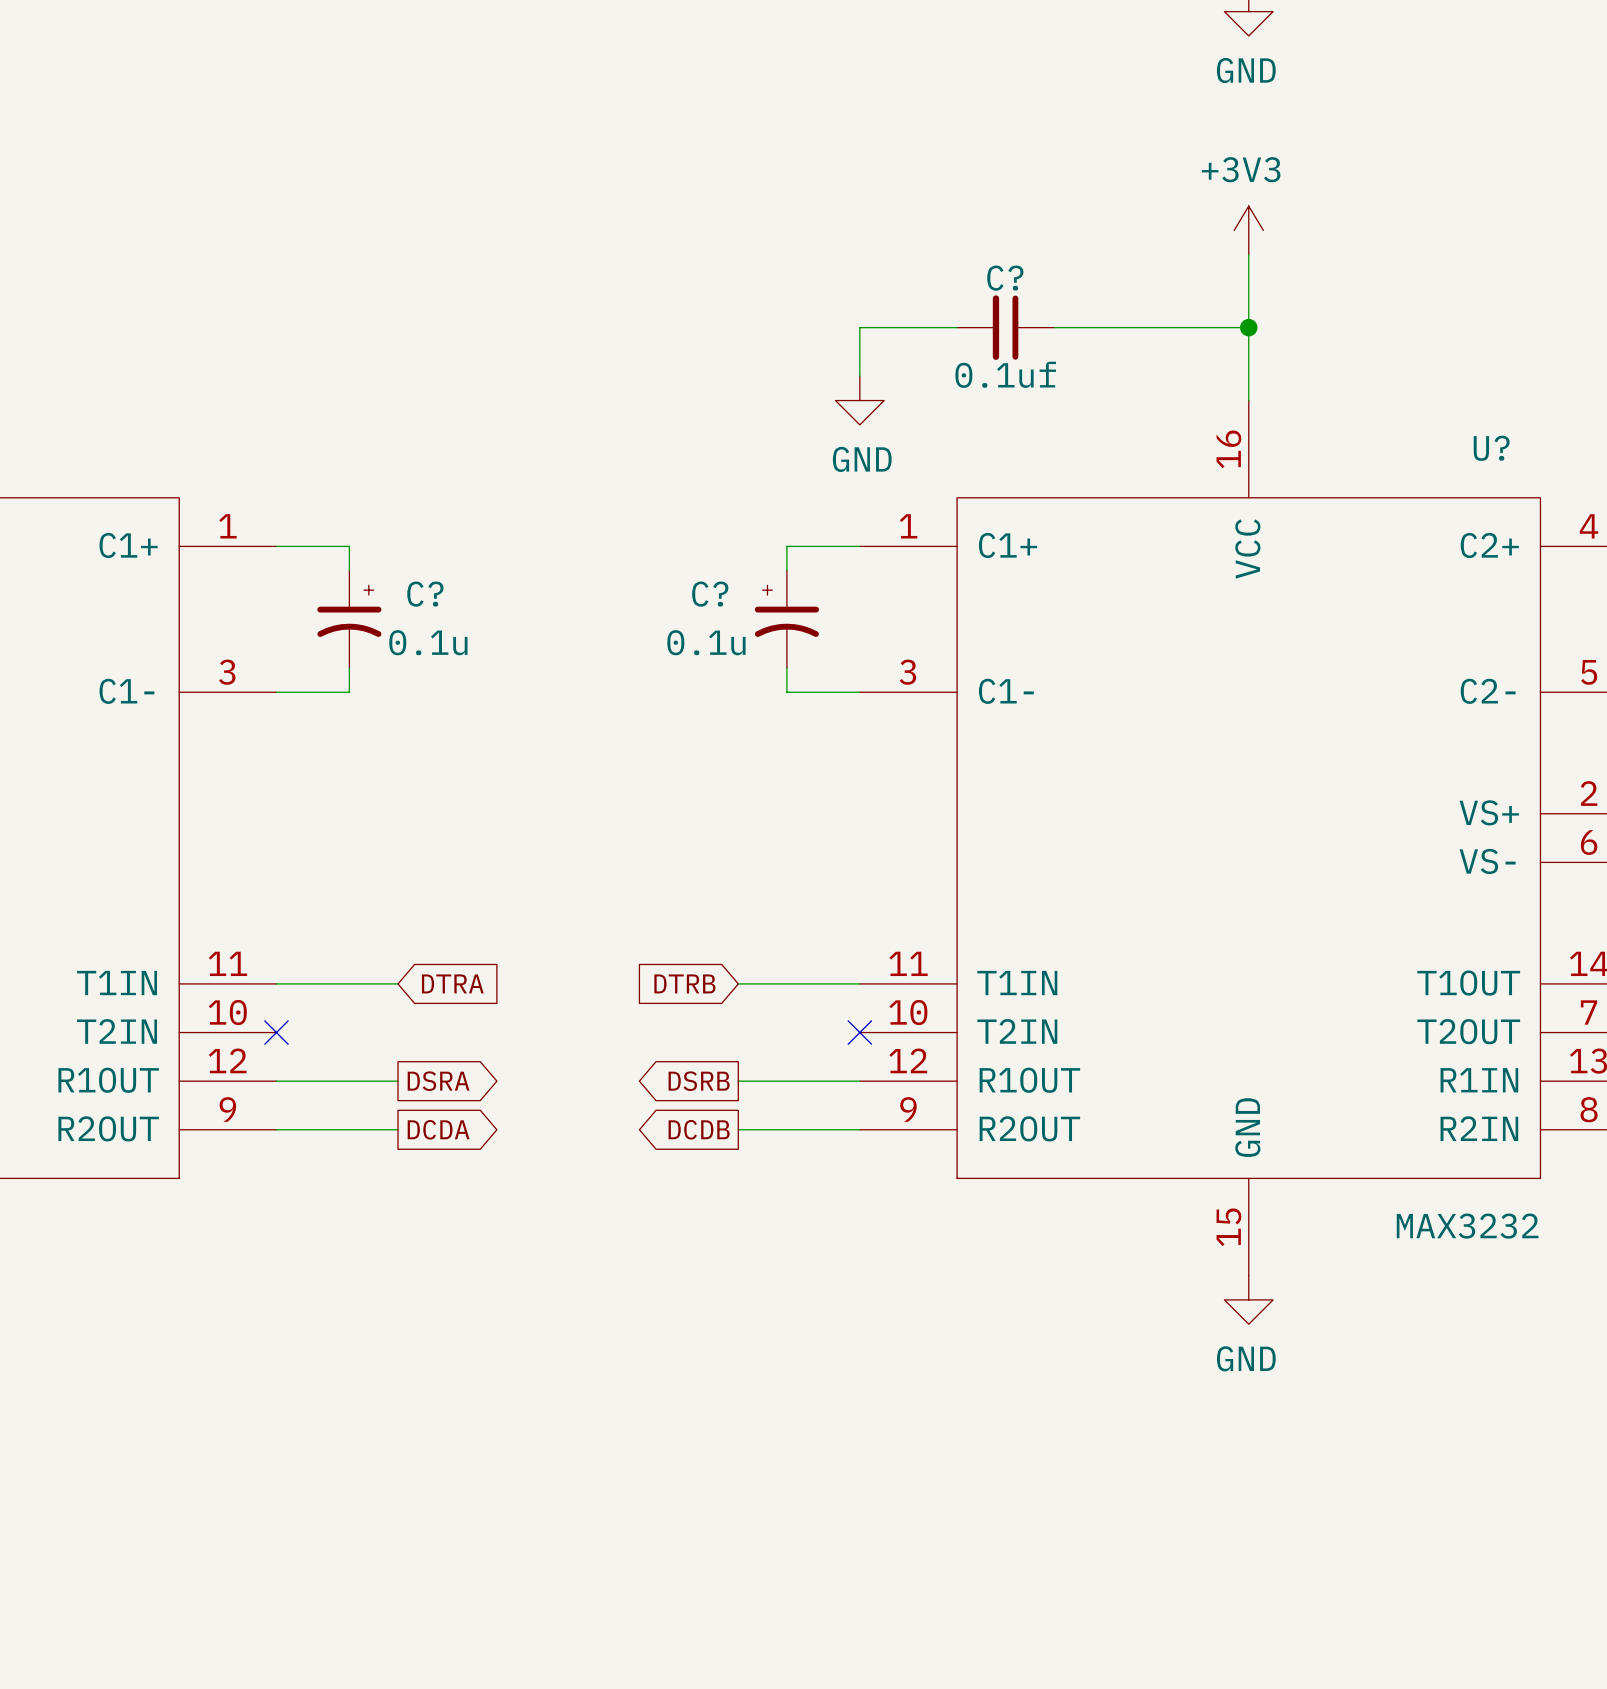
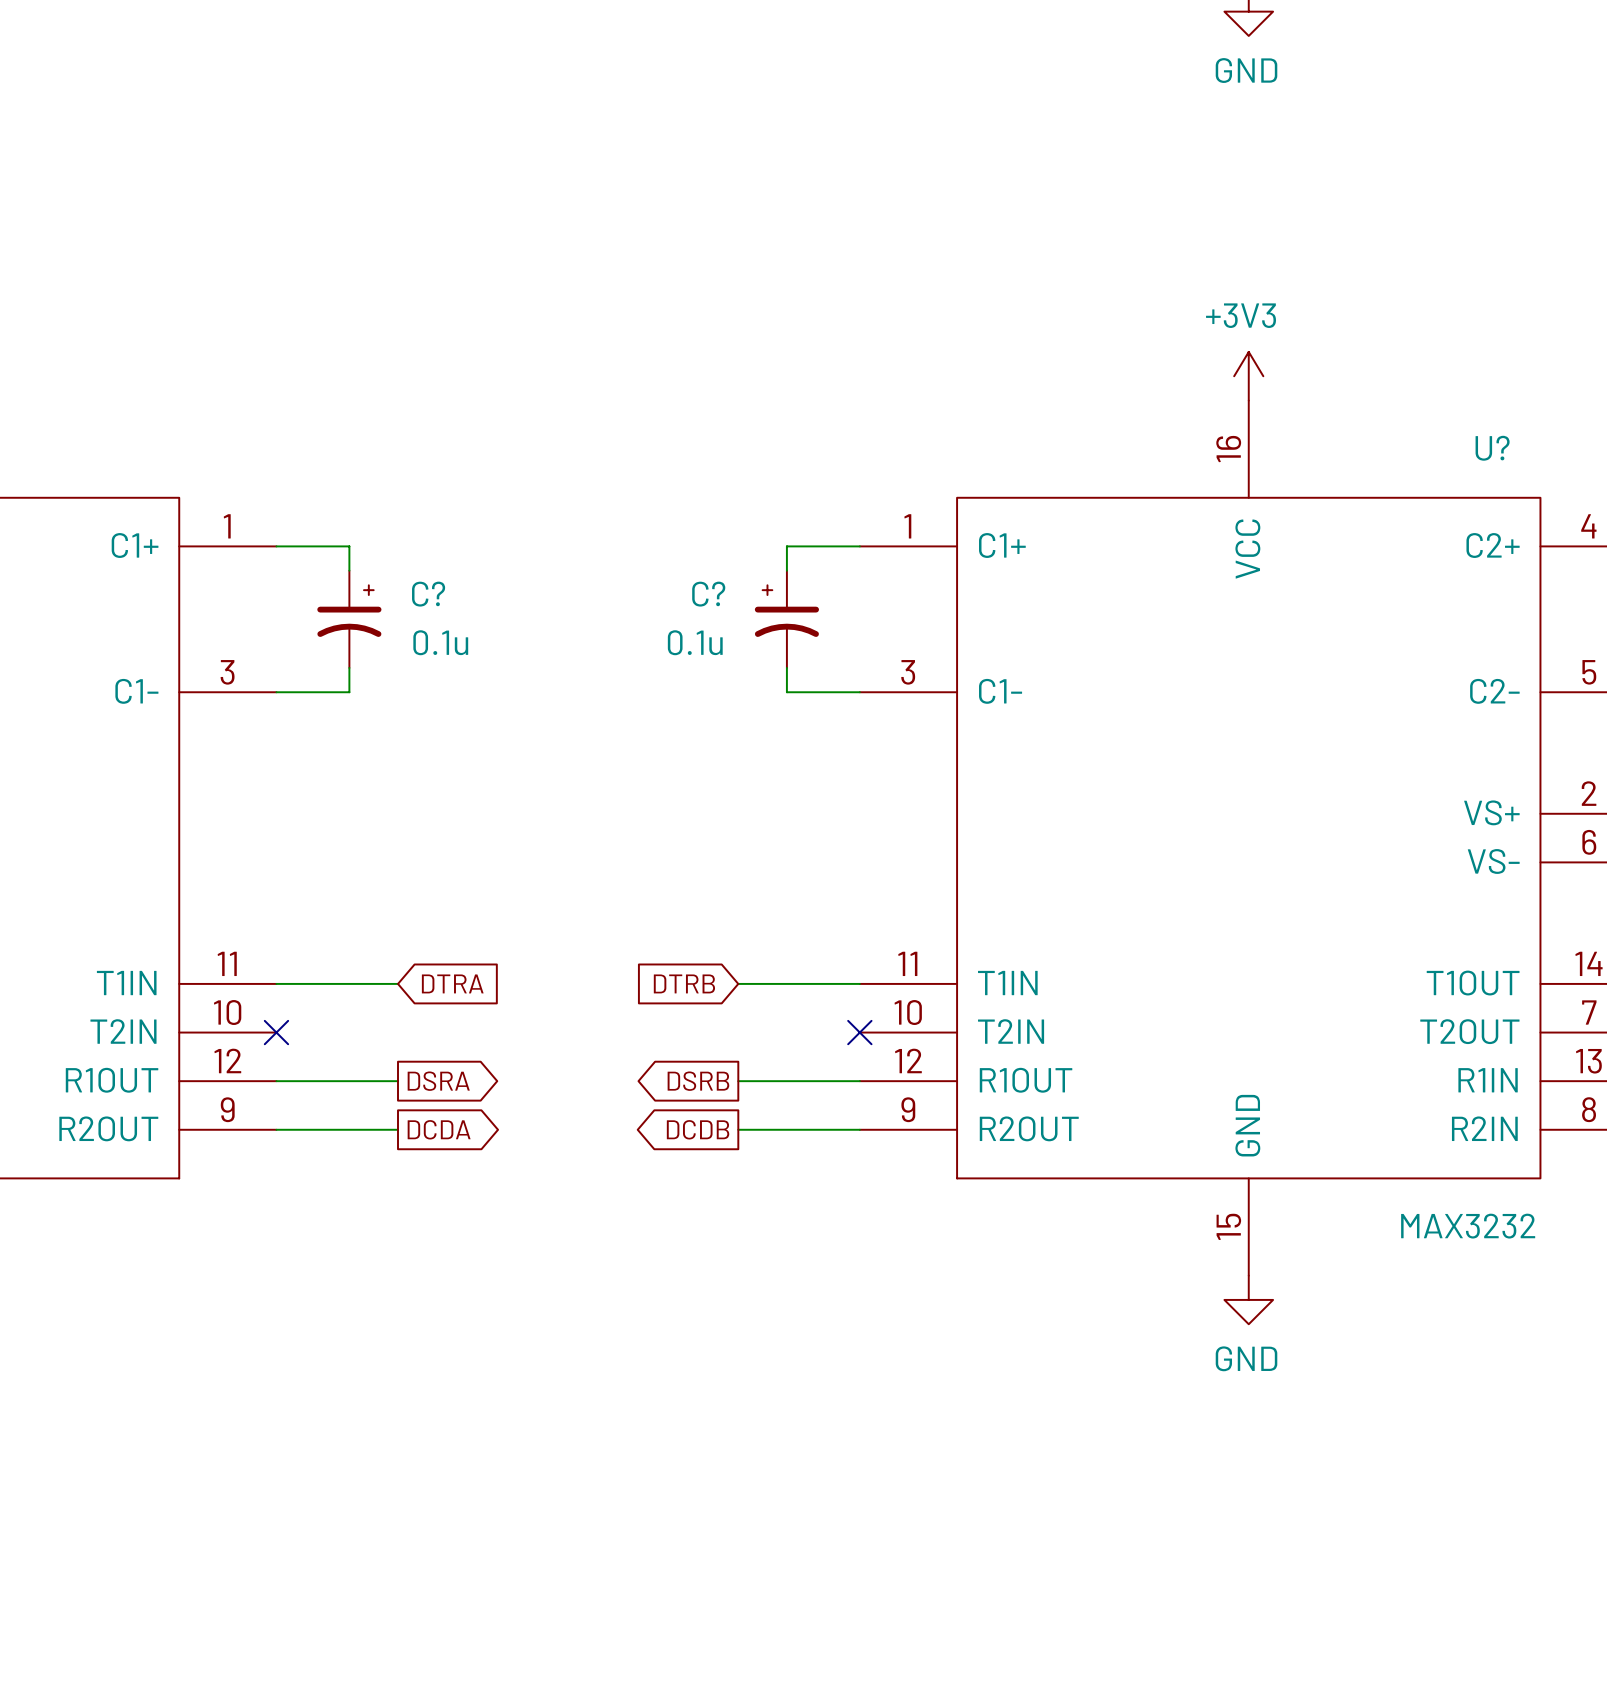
power symbol position: +3V3 (1248, 230) -> +3V3 (1248, 376)
wire: (1248, 254) (1248, 400) -> none
wire: (957, 327) (859, 327) (859, 376) -> none
C?: 0.1uf (1005, 327) -> none
wire: (1054, 327) (1248, 327) -> none
junction: (1248, 327) -> none
power symbol: GND (859, 400) -> none

